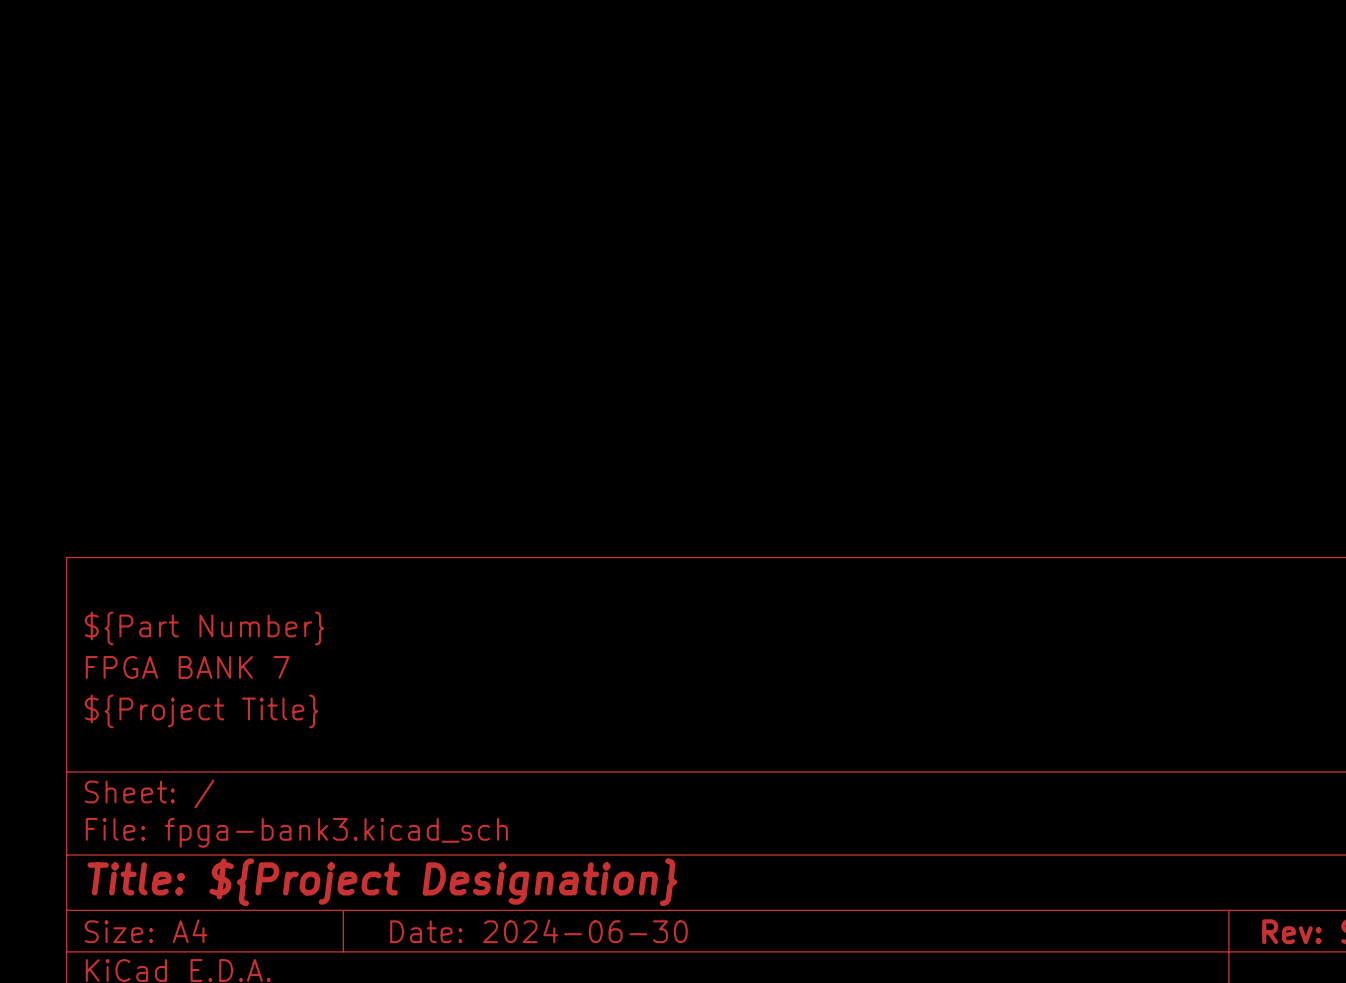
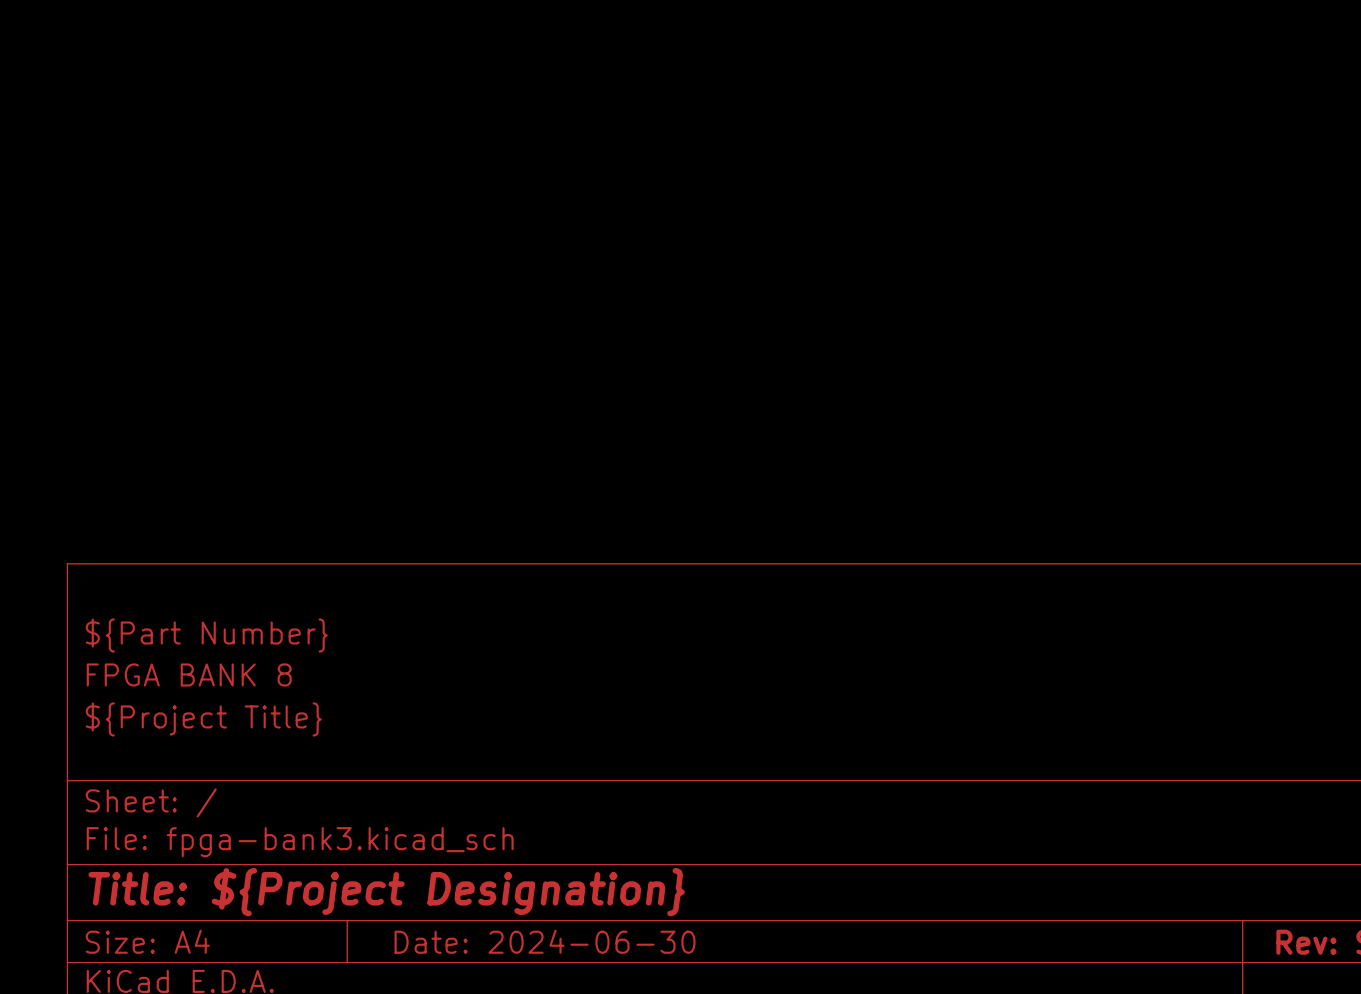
title block: FPGA BANK 7 (187, 667) -> FPGA BANK 8 (189, 674)

